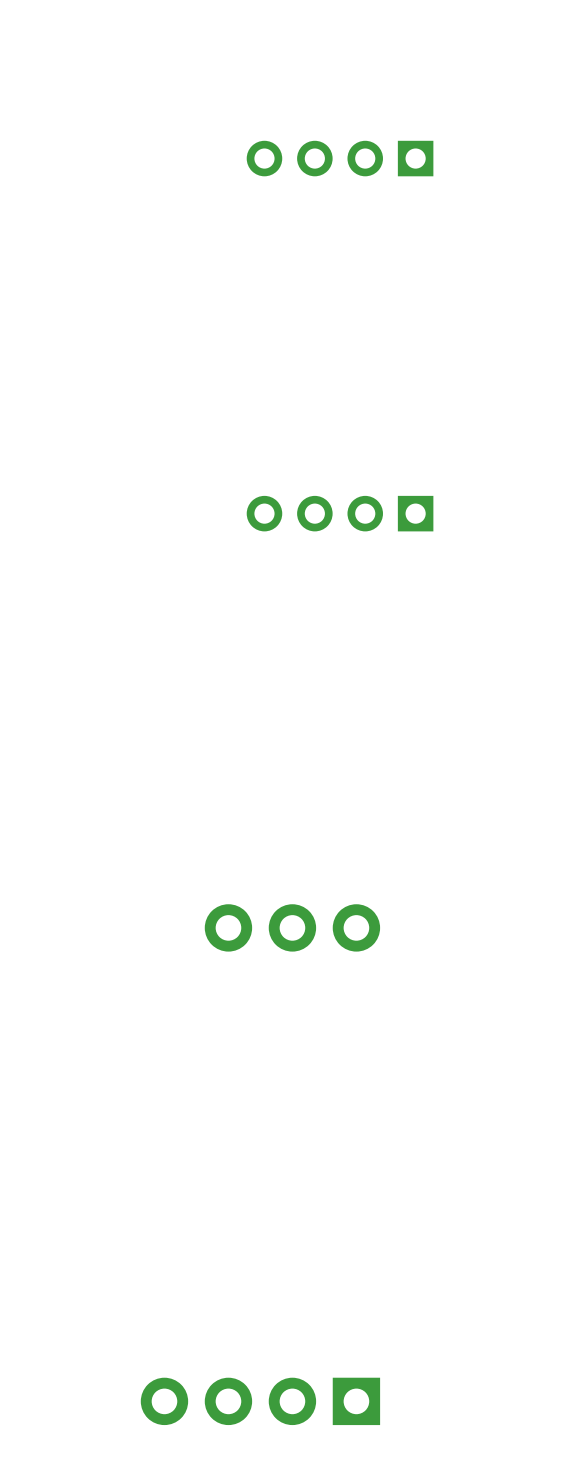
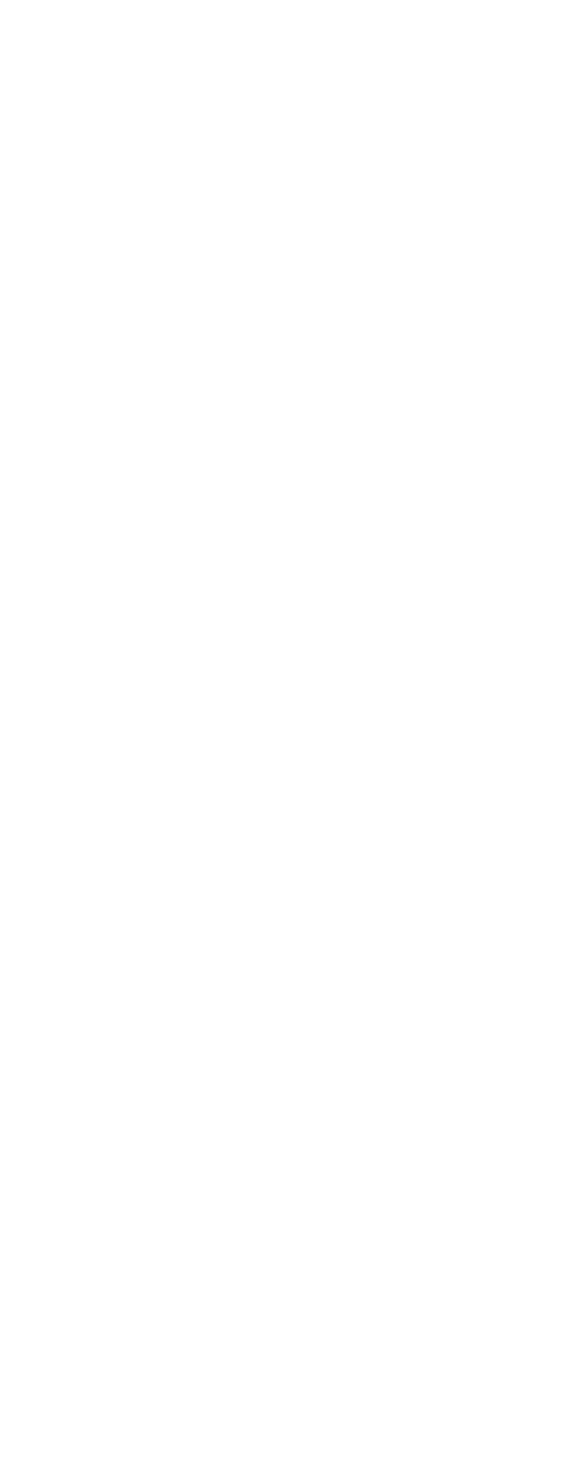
part: (340, 158) -> none
part: (340, 513) -> none
part: (292, 927) -> none
part: (260, 1401) -> none

